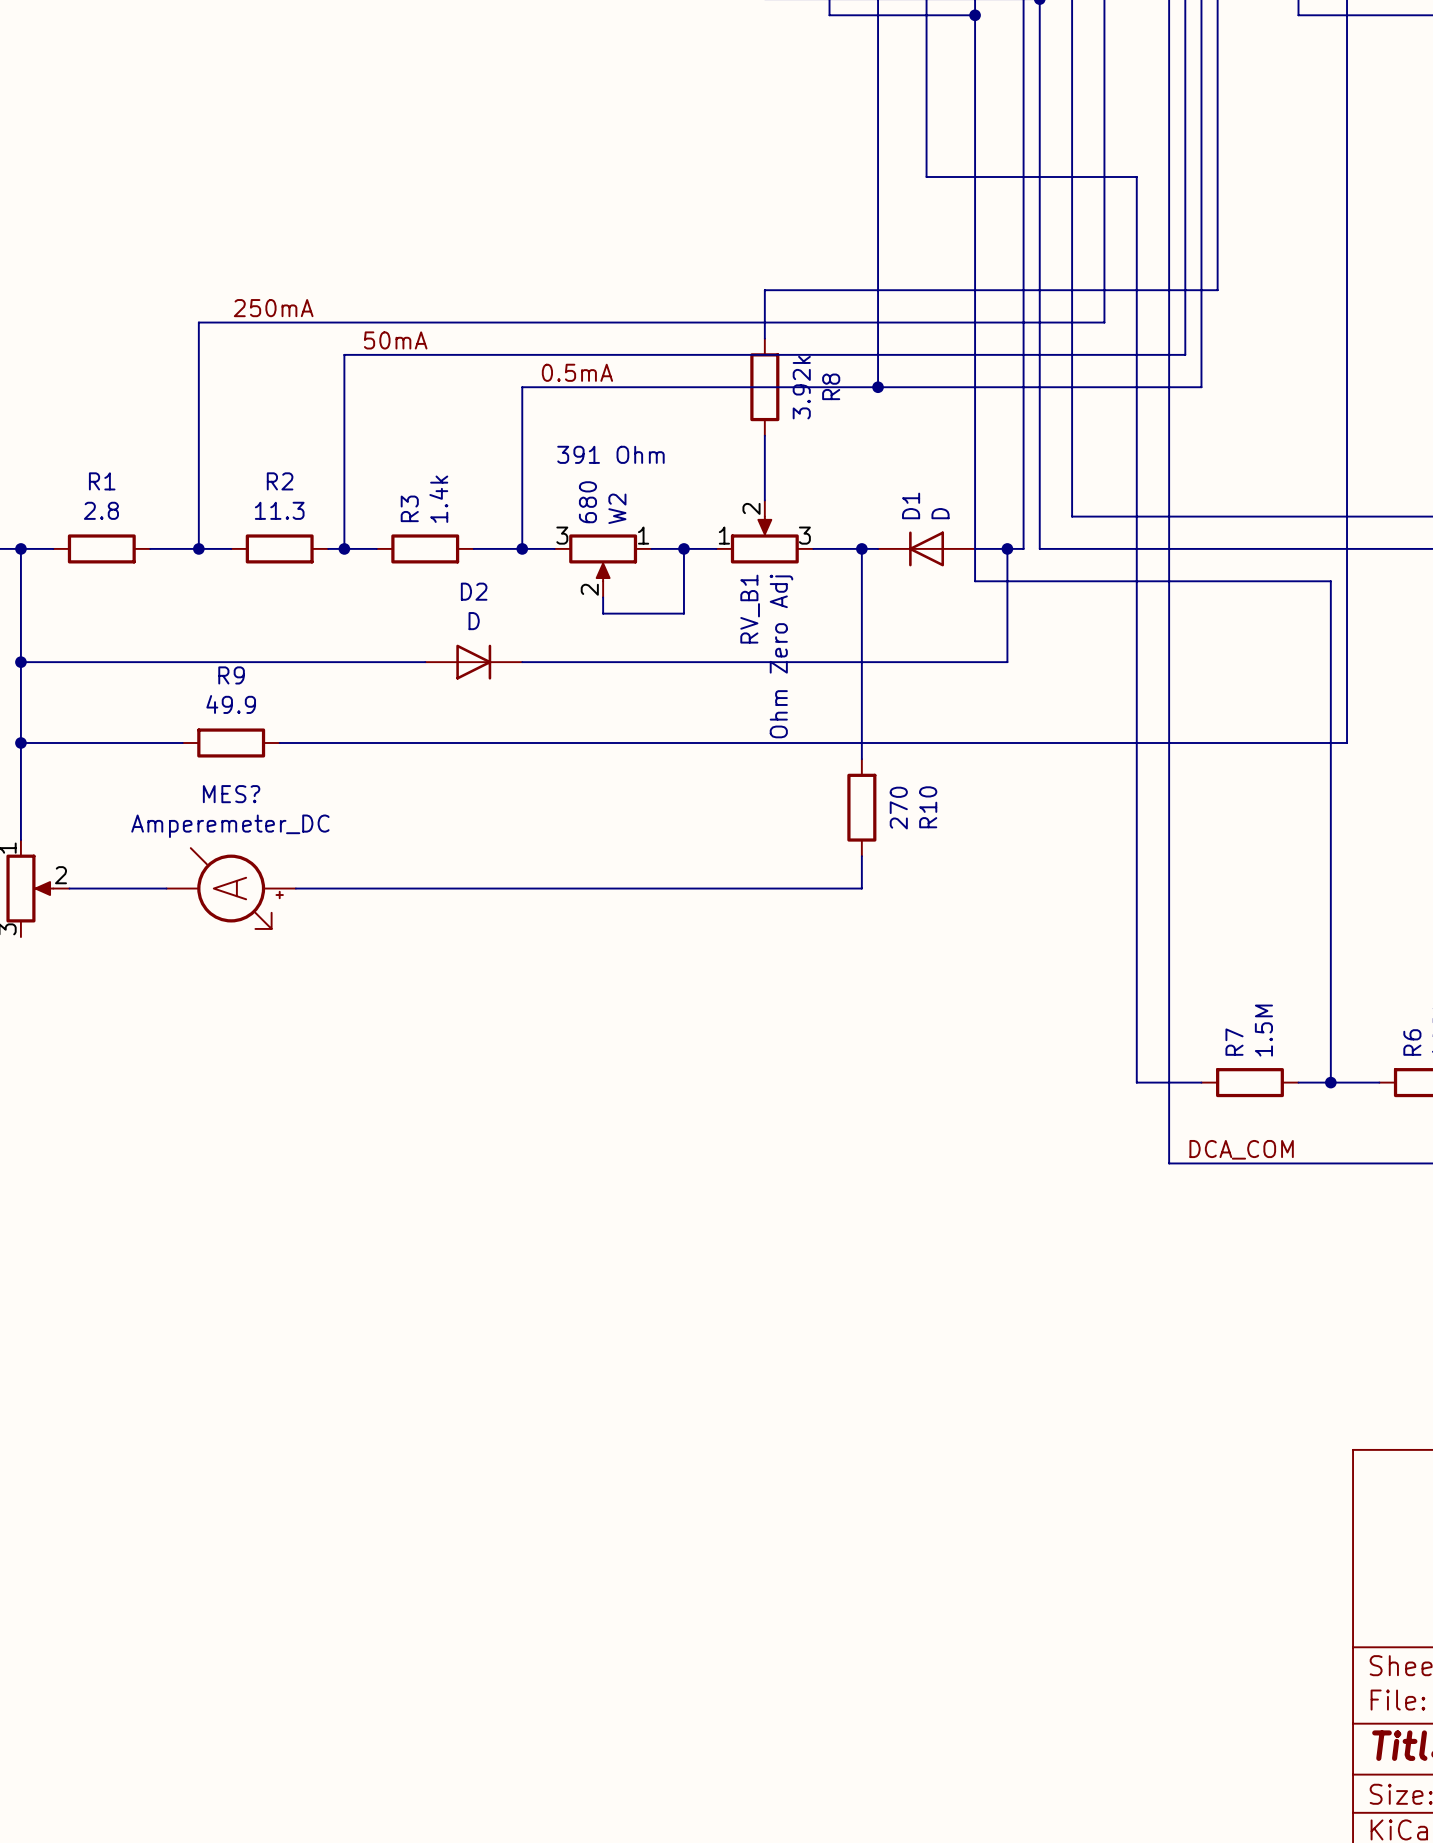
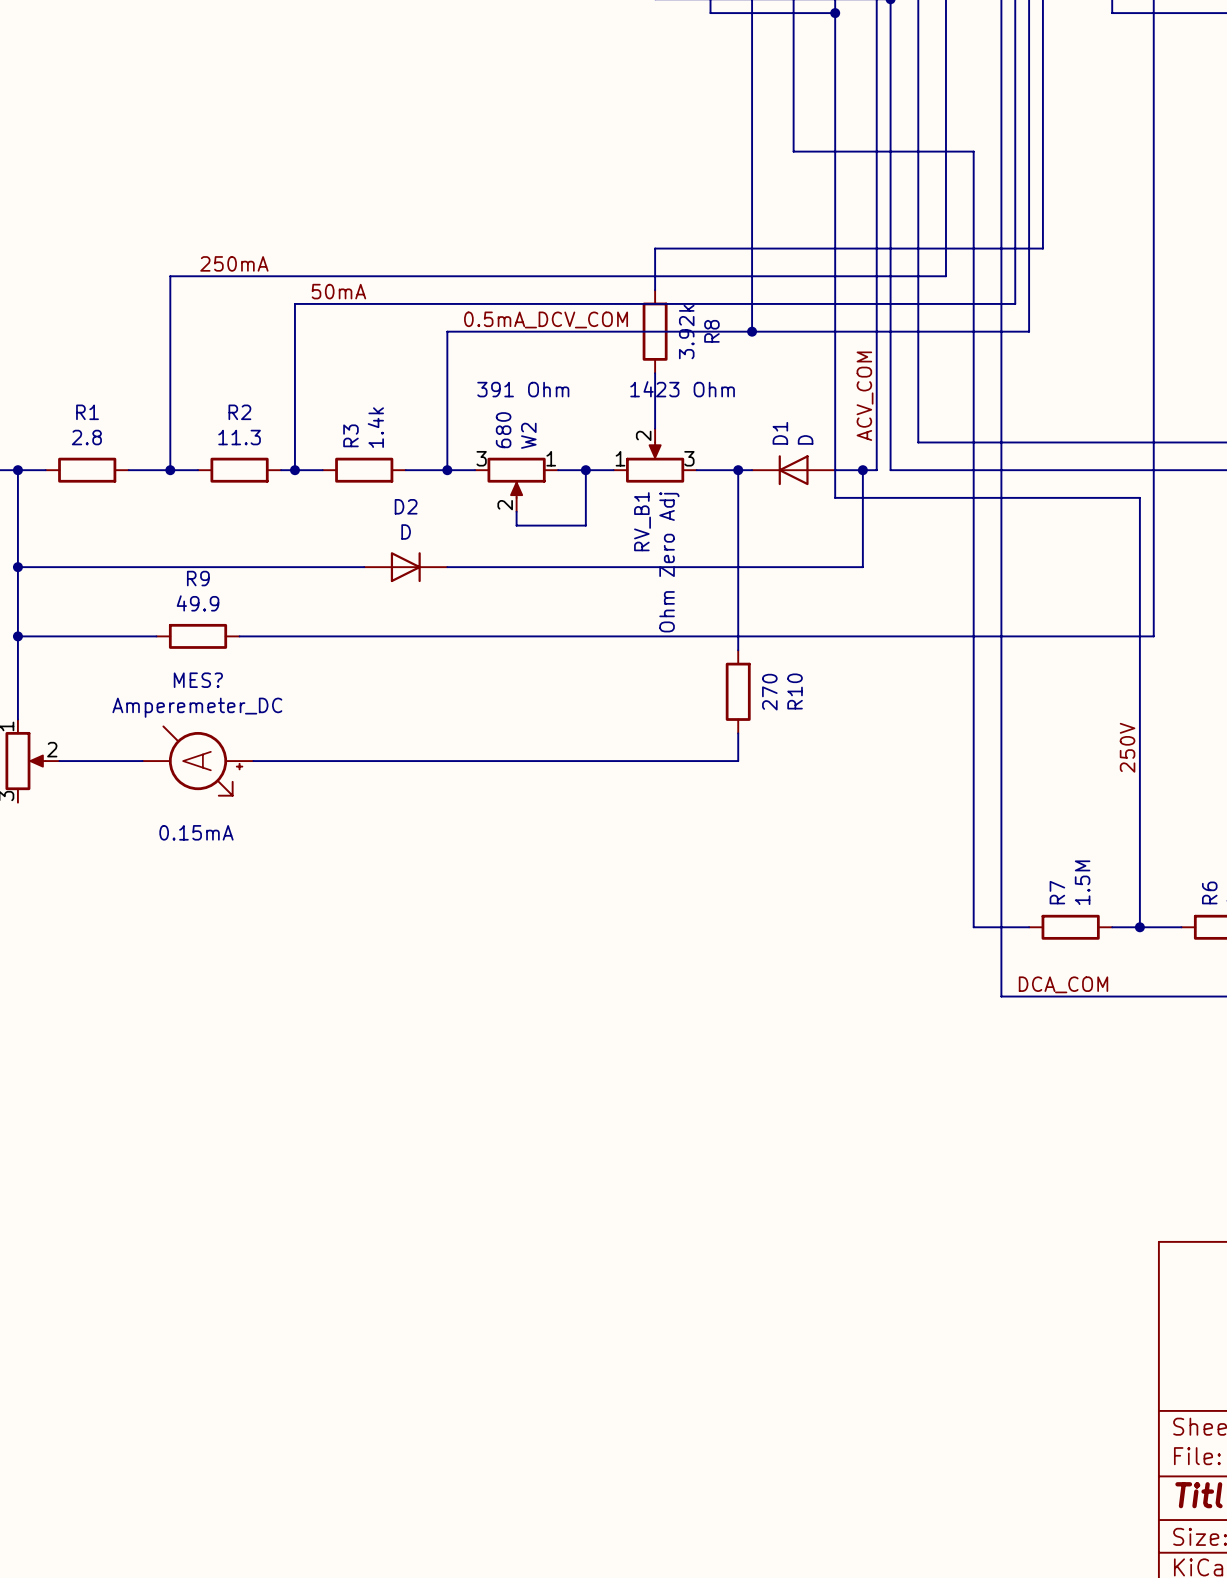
label: 0.5mA (577, 372) -> 0.5mA_DCV_COM (546, 319)
text: none -> 1423 Ohm (682, 389)
label: none -> ACV_COM (865, 396)
label: none -> 250V (1127, 747)
text: none -> 0.15mA (196, 832)

